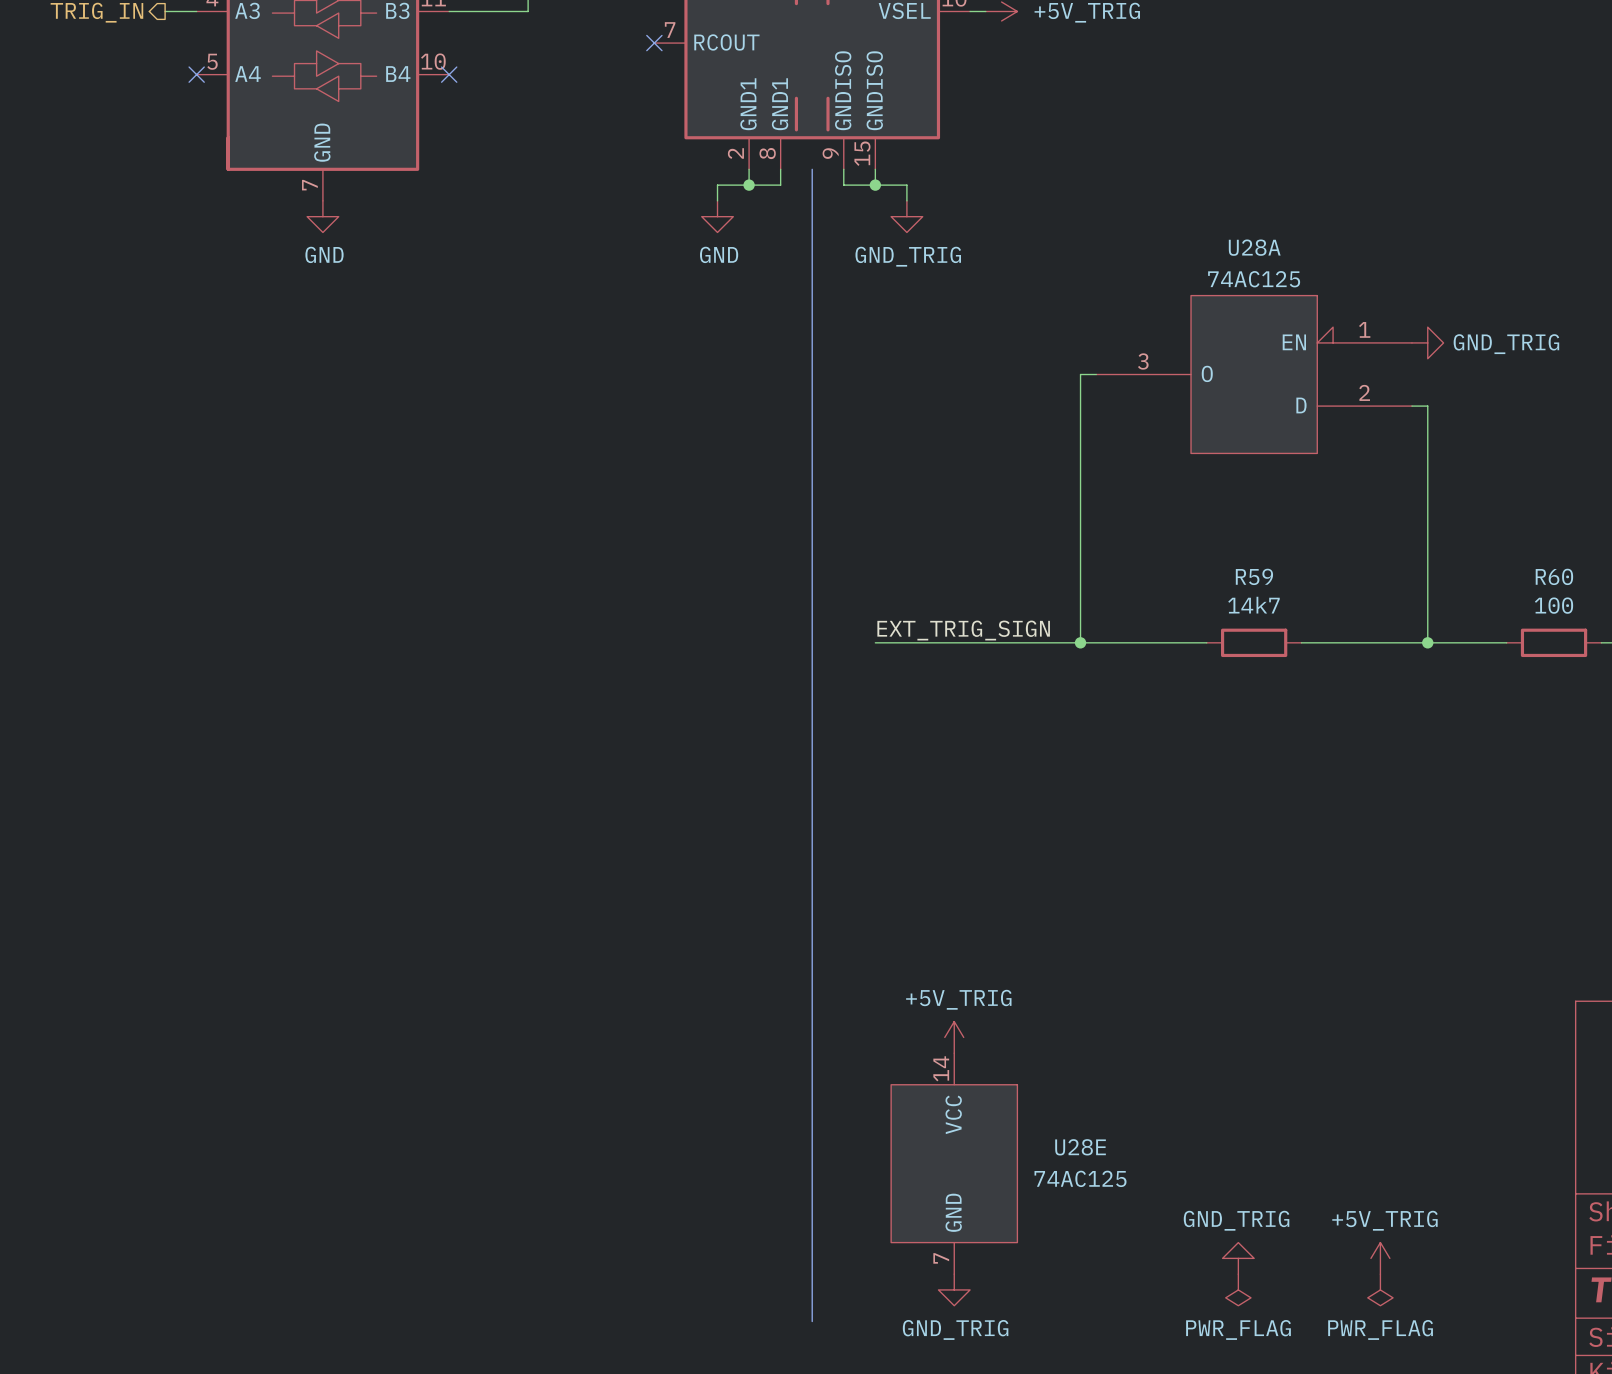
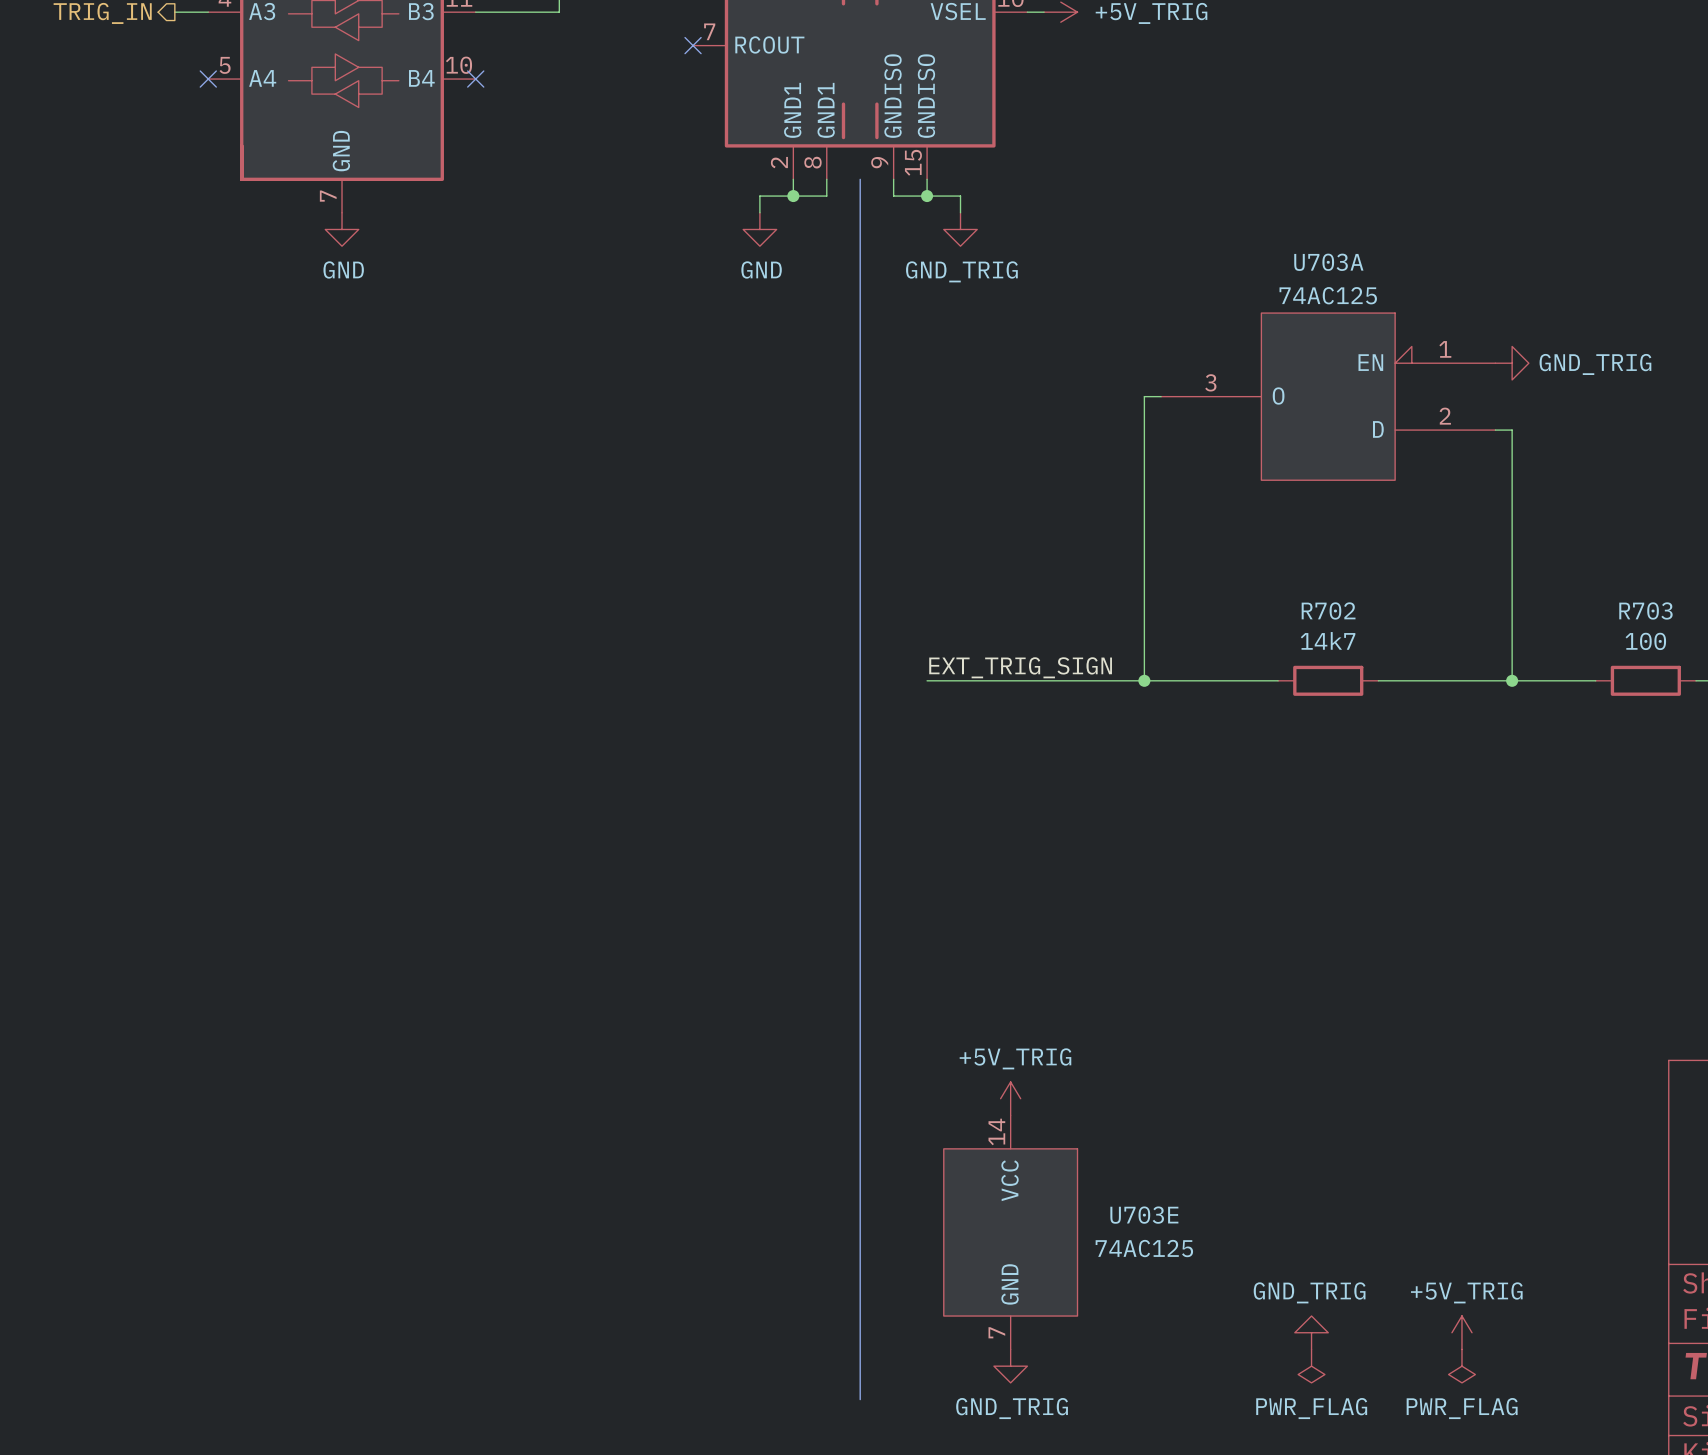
U28A name: U28A (1254, 247) -> U703A (1328, 262)
R59 name: R59 (1254, 576) -> R702 (1328, 610)
R60 name: R60 (1554, 576) -> R703 (1645, 610)
U28E name: U28E (1080, 1147) -> U703E (1144, 1215)

